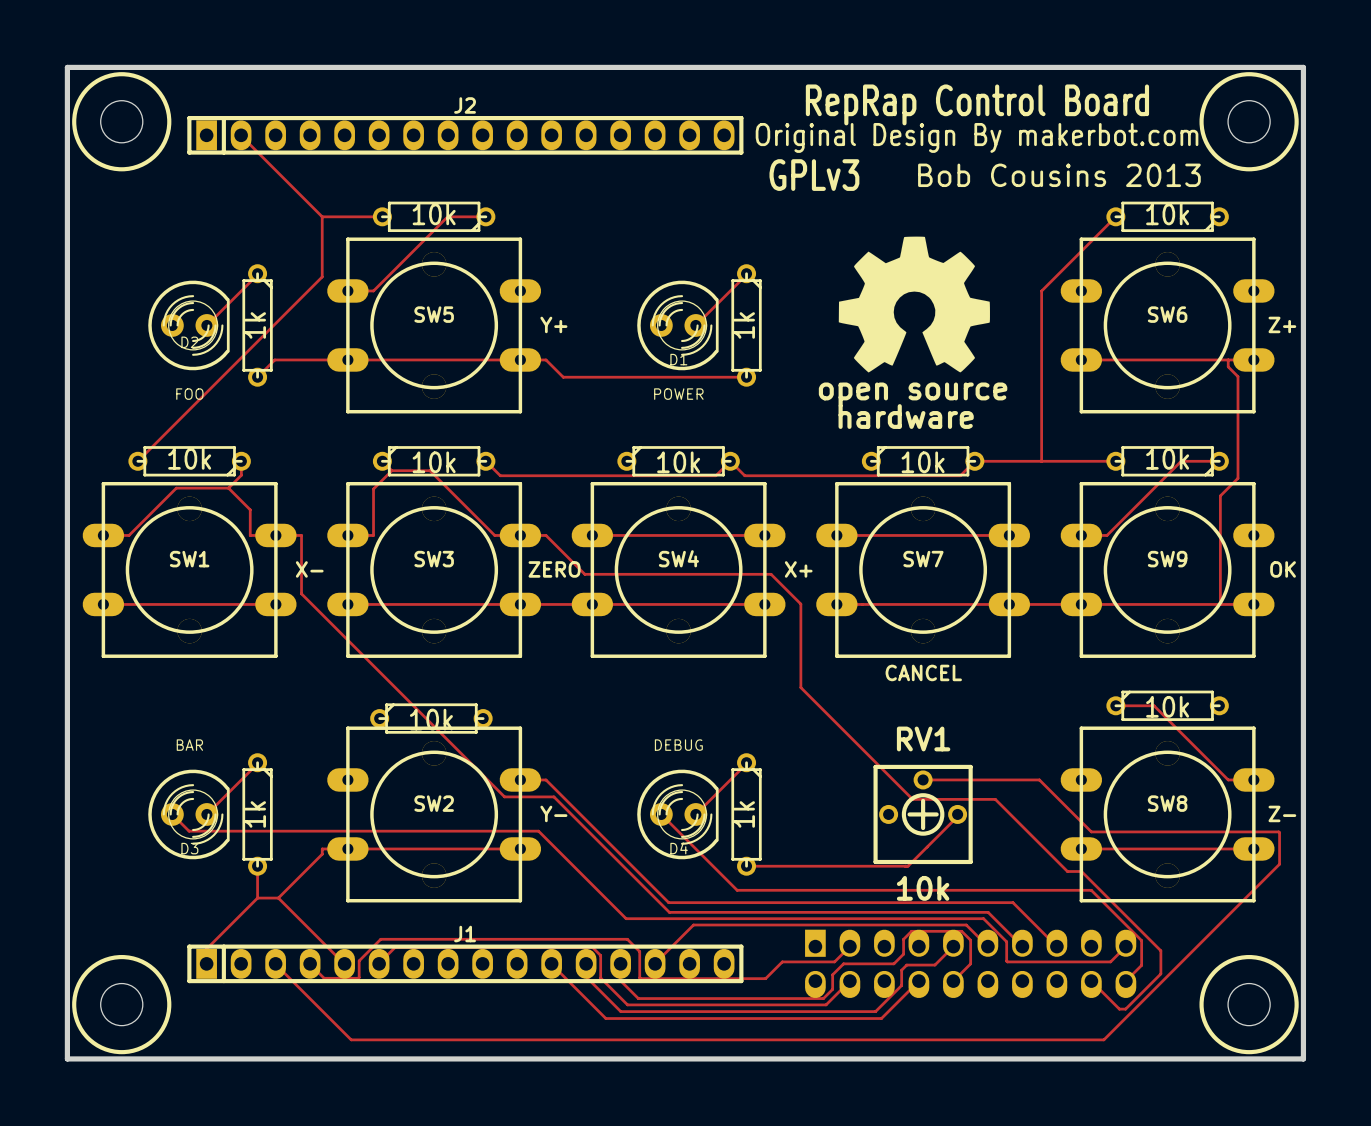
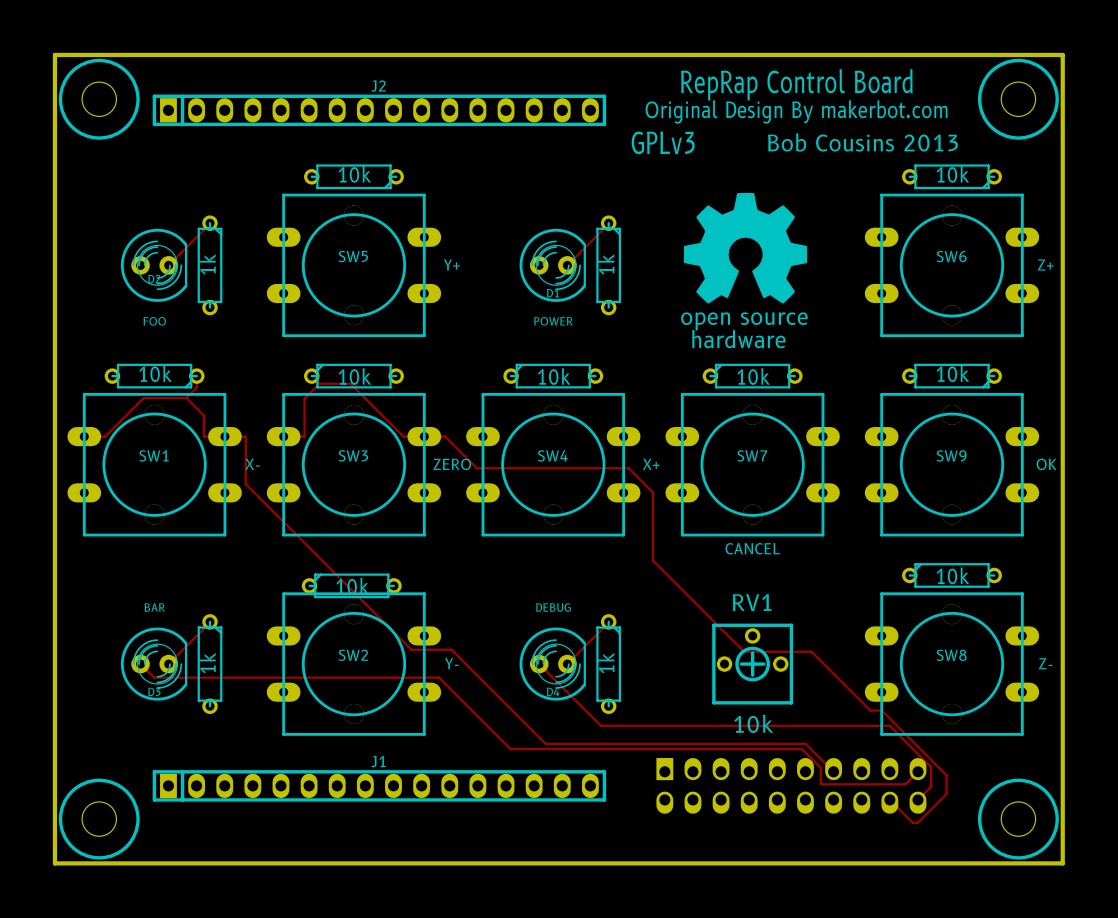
track: (240, 135) (322, 216) -> none
track: (322, 216) (382, 216) -> none
track: (322, 216) (322, 276) (137, 461) -> none
track: (485, 216) (447, 216) (373, 290) (347, 290) -> none
track: (1115, 216) (1041, 291) (1041, 461) -> none
track: (1081, 359) (1253, 359) -> none
track: (1228, 359) (1228, 366) (1237, 376) (1237, 478) (1220, 495) (1220, 604) -> none
track: (257, 377) (274, 359) (546, 359) (563, 377) (746, 377) -> none
track: (485, 461) (500, 475) (715, 475) (730, 461) (744, 475) (960, 475) (974, 461) (1115, 461) -> none
track: (1219, 461) (1181, 461) (1106, 535) (1081, 535) -> none
track: (592, 535) (764, 535) -> none
track: (836, 535) (1009, 535) -> none
track: (103, 604) (275, 604) -> none
track: (347, 604) (764, 604) -> none
track: (836, 604) (1253, 604) -> none
track: (1115, 705) (1154, 705) (1228, 779) (1253, 779) -> none
track: (520, 779) (546, 779) (668, 902) (1012, 902) (1056, 946) -> none
track: (923, 779) (1039, 779) (1091, 831) (1278, 831) (1279, 864) (1103, 1039) (351, 1039) (275, 963) -> none
track: (957, 814) (908, 866) (746, 866) -> none
track: (520, 848) (322, 848) (322, 854) (278, 898) -> none
track: (1081, 848) (1253, 848) -> none
track: (257, 866) (257, 898) -> none
track: (257, 898) (278, 898) -> none
track: (257, 898) (206, 949) (206, 963) -> none
track: (278, 898) (344, 963) -> none
track: (849, 946) (834, 961) (782, 961) (765, 978) (640, 978) (639, 951) (627, 939) (380, 939) (359, 960) (358, 978) (324, 978) (309, 963) -> none
track: (953, 946) (934, 965) (906, 965) (901, 970) (901, 985) (875, 1011) (620, 1011) (585, 976) (585, 963) -> none
track: (987, 946) (966, 925) (693, 925) (654, 963) -> none
track: (378, 963) (395, 947) (592, 947) (600, 955) (600, 978) (627, 1004) (826, 1004) (849, 981) -> none
track: (551, 963) (605, 1018) (881, 1018) (918, 981) -> none
track: (620, 963) (620, 980) (638, 998) (823, 998) (832, 989) (832, 974) (843, 963) (893, 963) (903, 954) (903, 939) (911, 931) (961, 931) (970, 940) (970, 963) (953, 981) -> none

